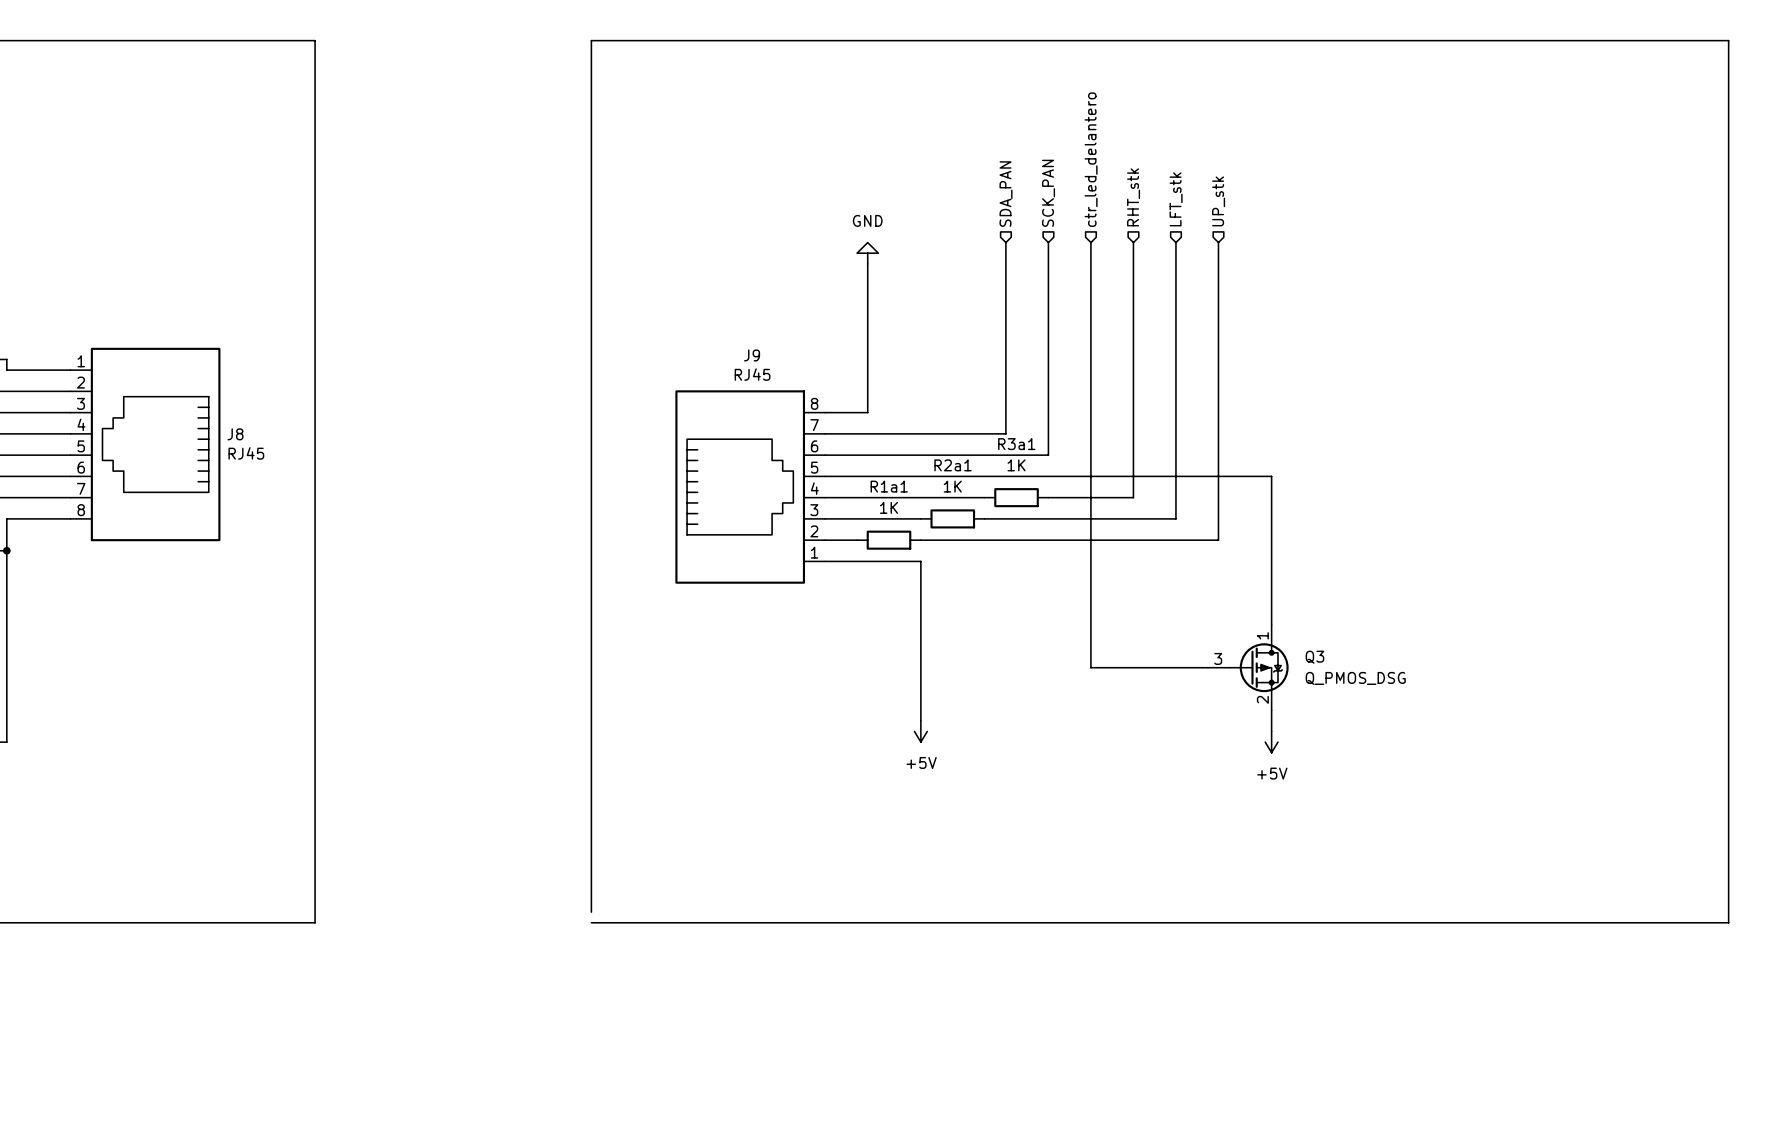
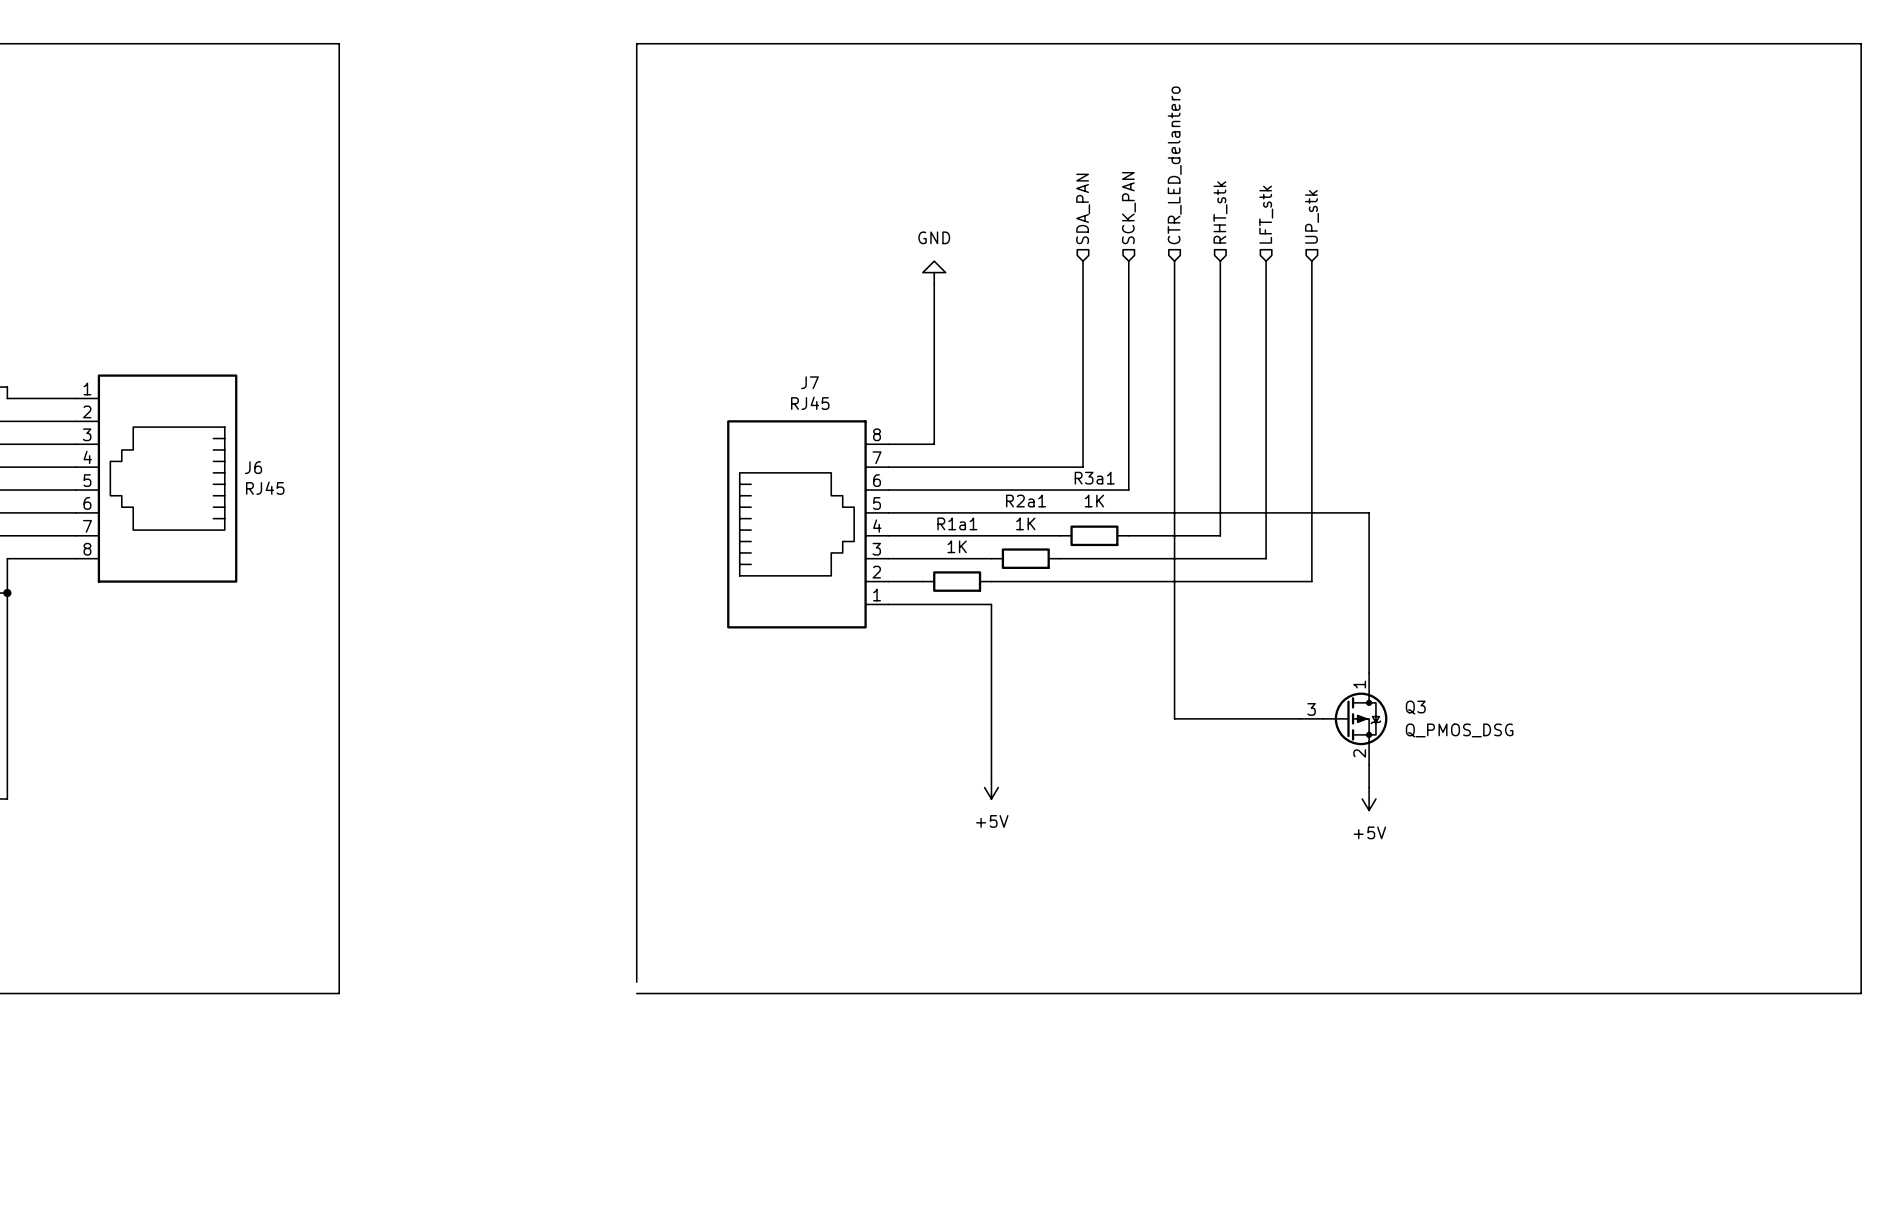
hierarchical label: ctr_led_delantero (1091, 159) -> CTR_LED_delantero (1174, 165)
J9 name: J9 (752, 355) -> J7 (809, 382)
J8 name: J8 (235, 434) -> J6 (253, 467)

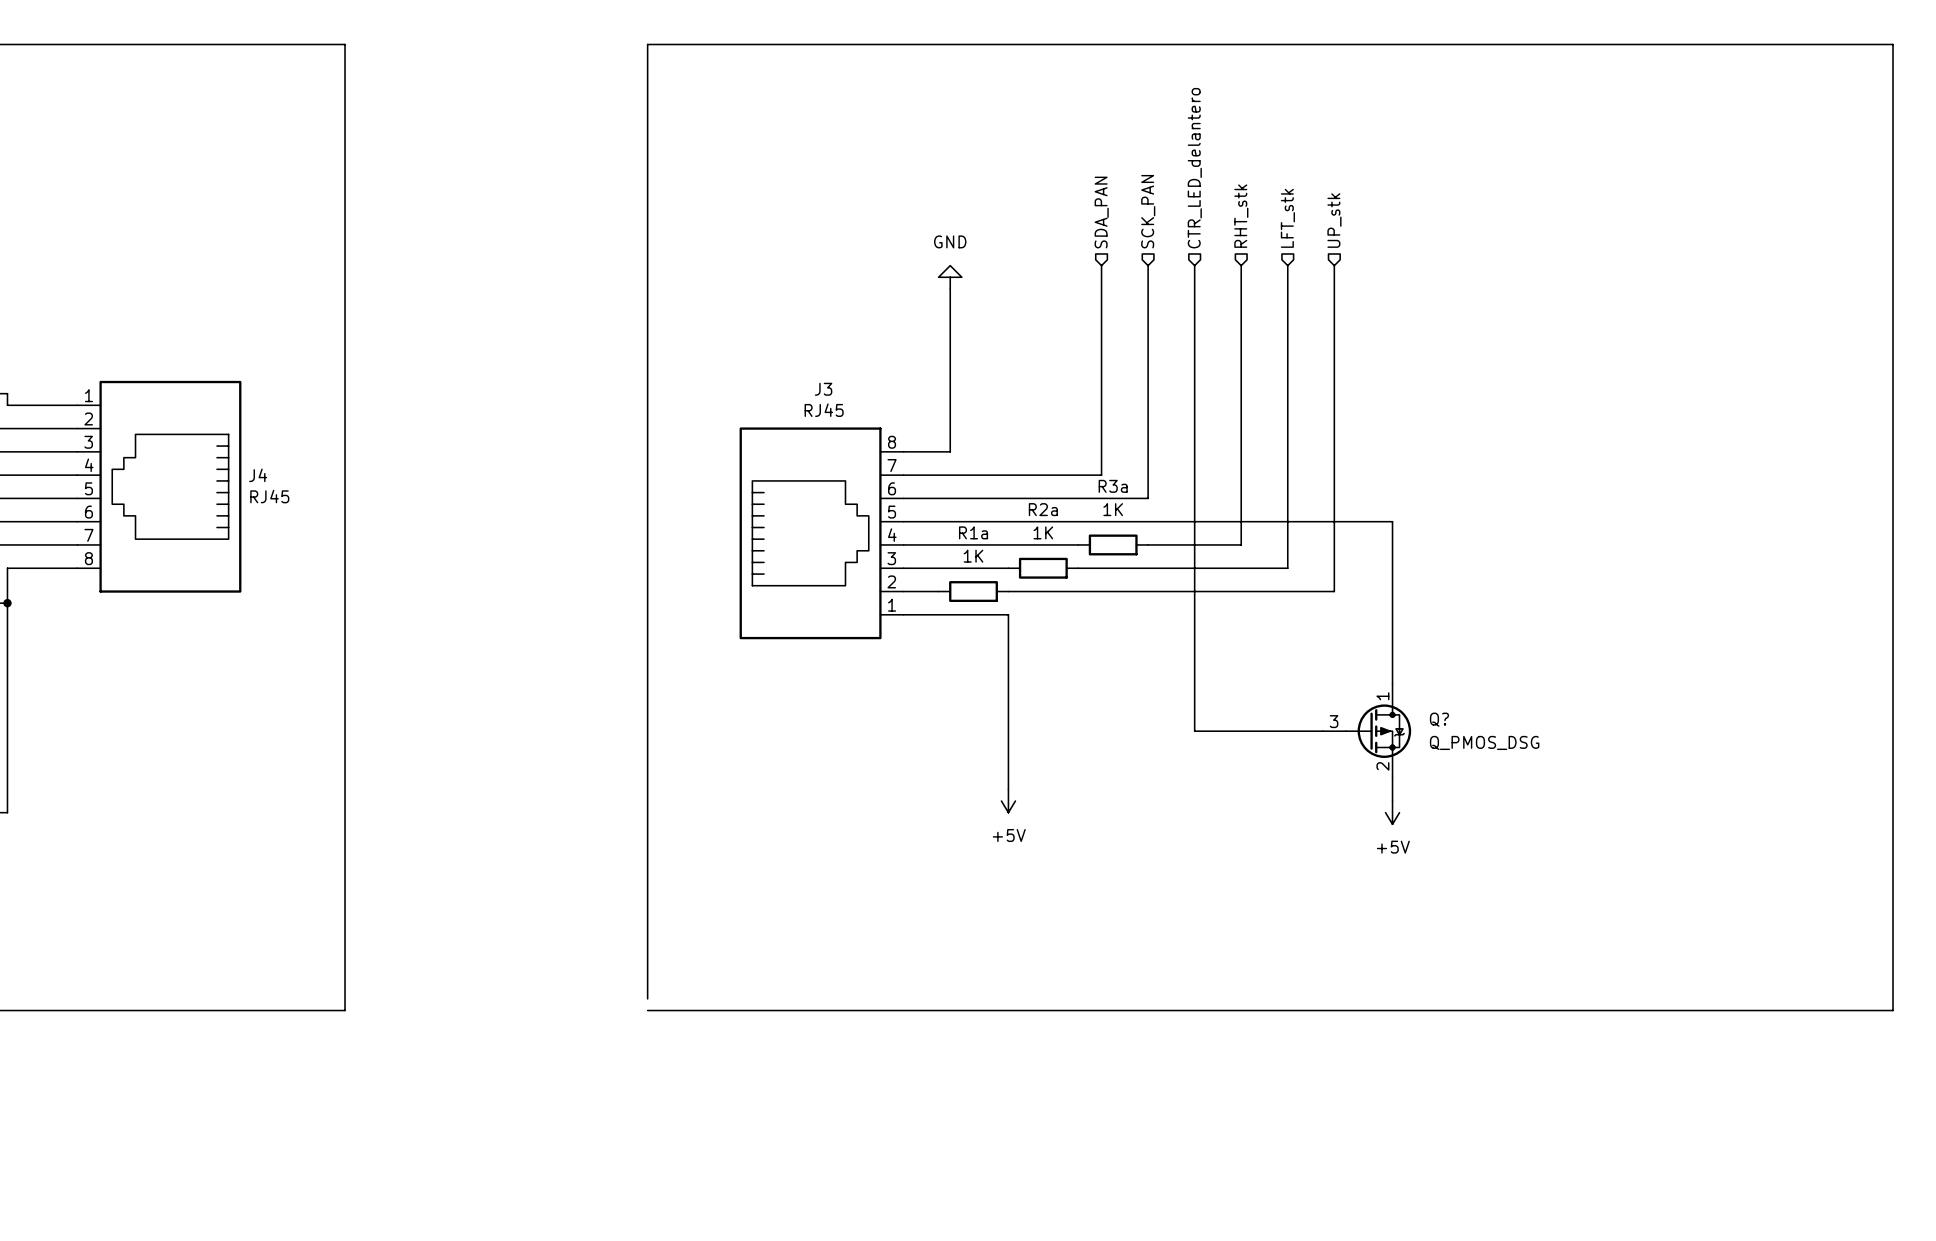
J7 name: J7 (809, 382) -> J3 (823, 389)
J6 name: J6 (253, 467) -> J4 (258, 475)
R3a1 name: R3a1 (1094, 478) -> R3a (1113, 486)
R2a1 name: R2a1 (1026, 501) -> R2a (1043, 509)
R1a1 name: R1a1 (957, 523) -> R1a (973, 532)
Q3 name: Q3 (1415, 707) -> Q? (1439, 719)

